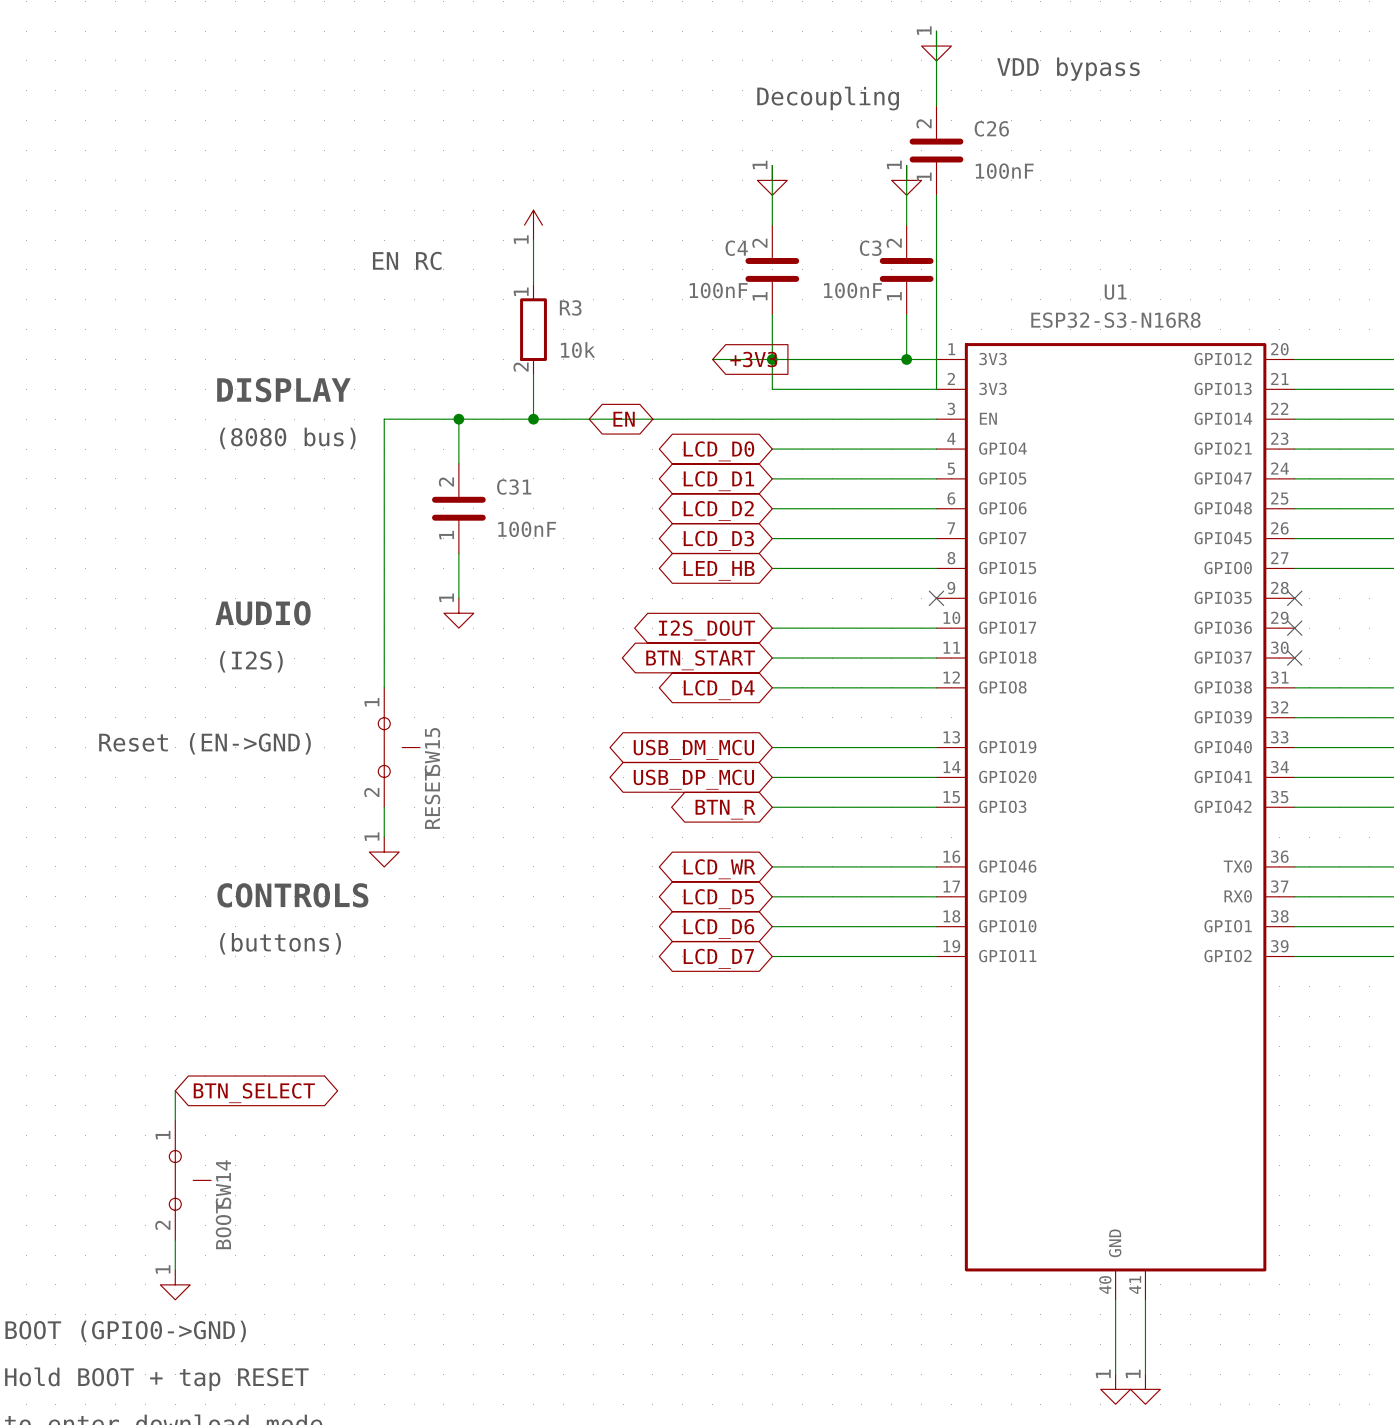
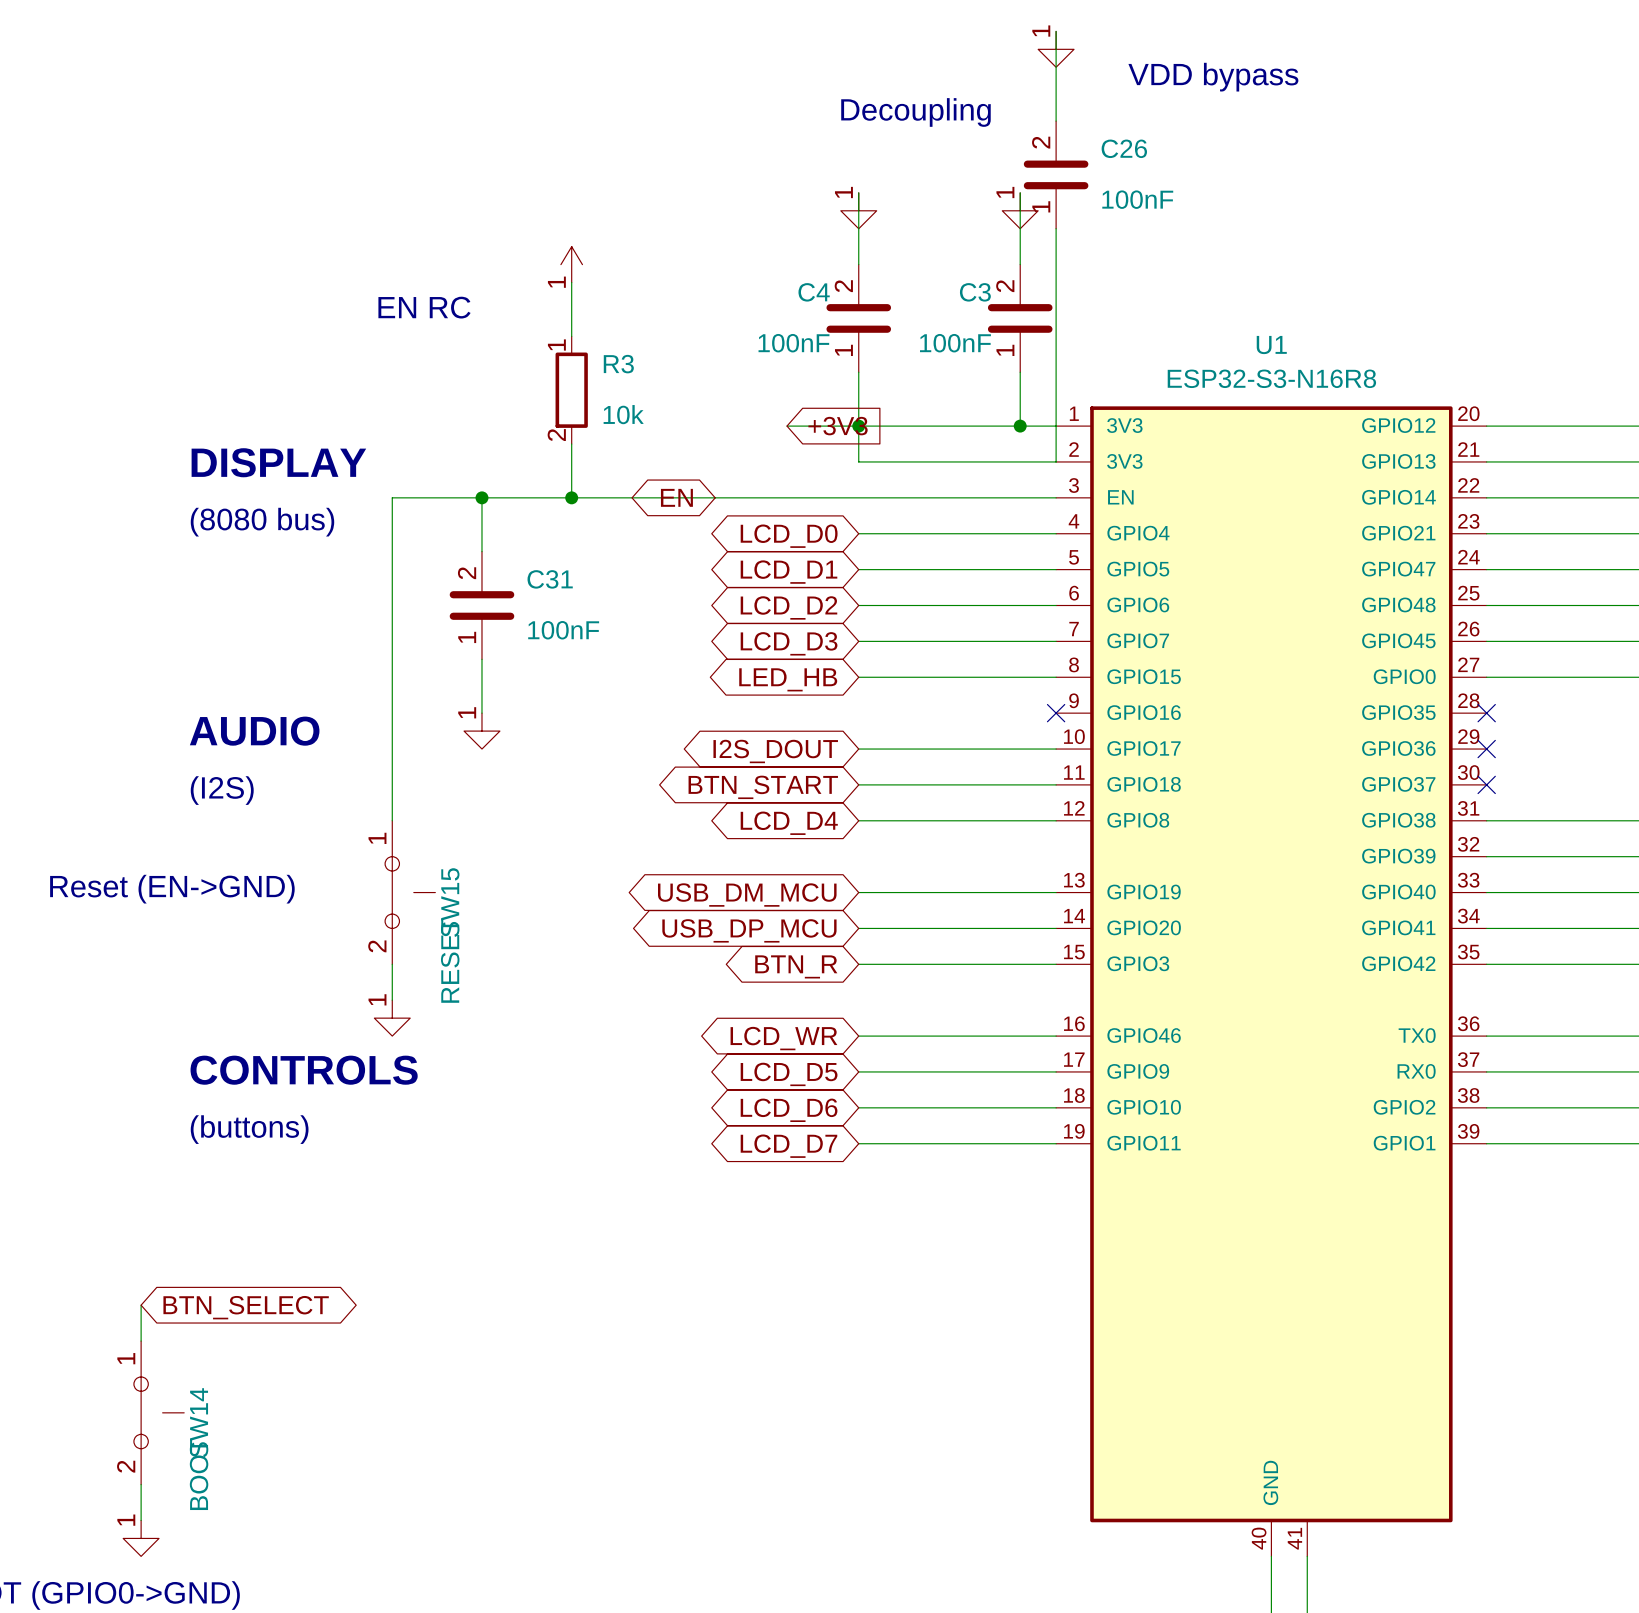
U1 pin name: GPIO1 (1228, 926) -> GPIO2 (1404, 1107)
U1 pin name: GPIO2 (1227, 956) -> GPIO1 (1404, 1143)

